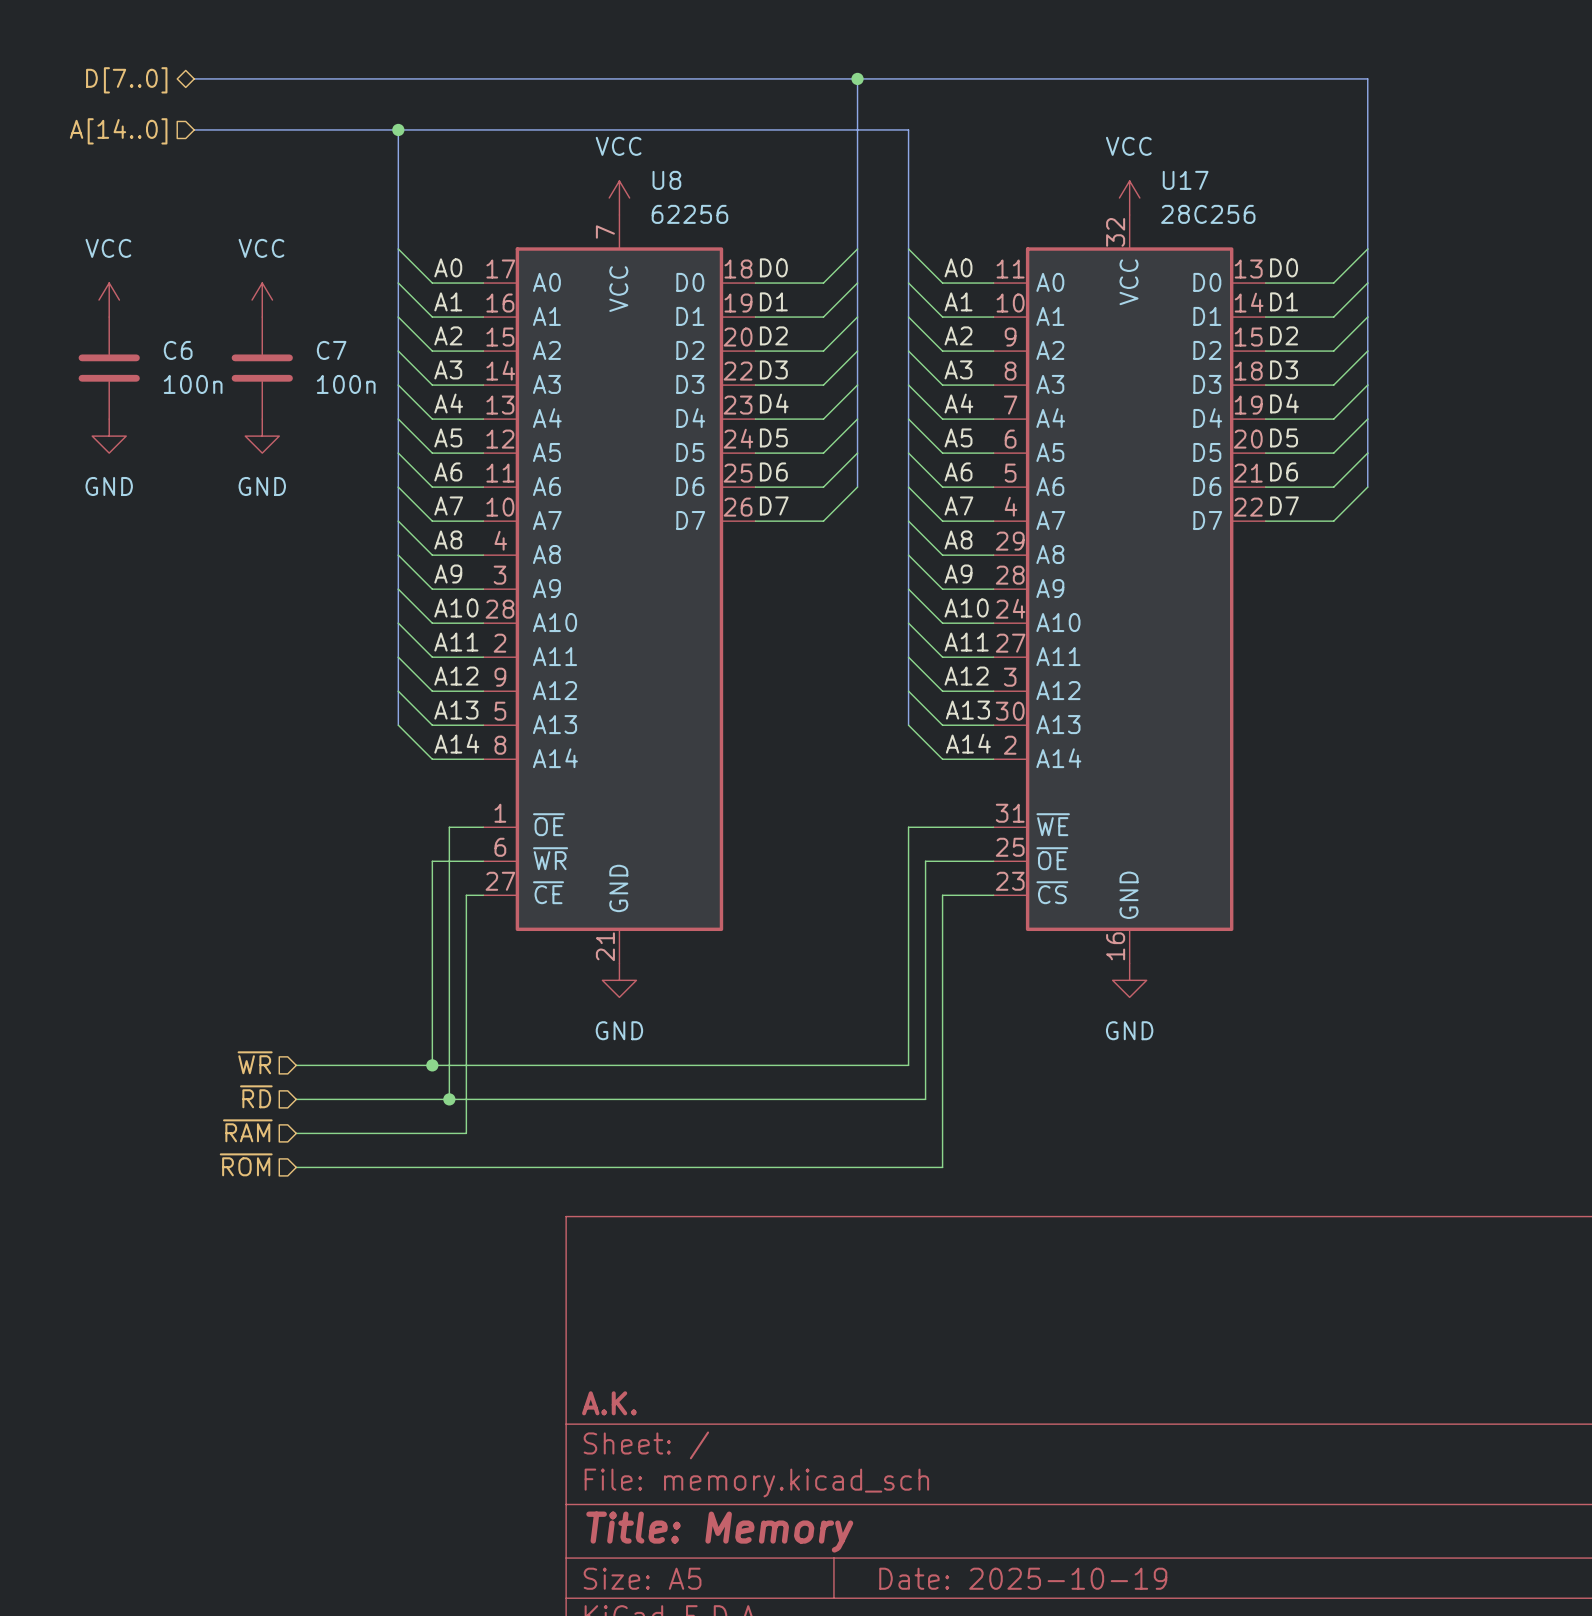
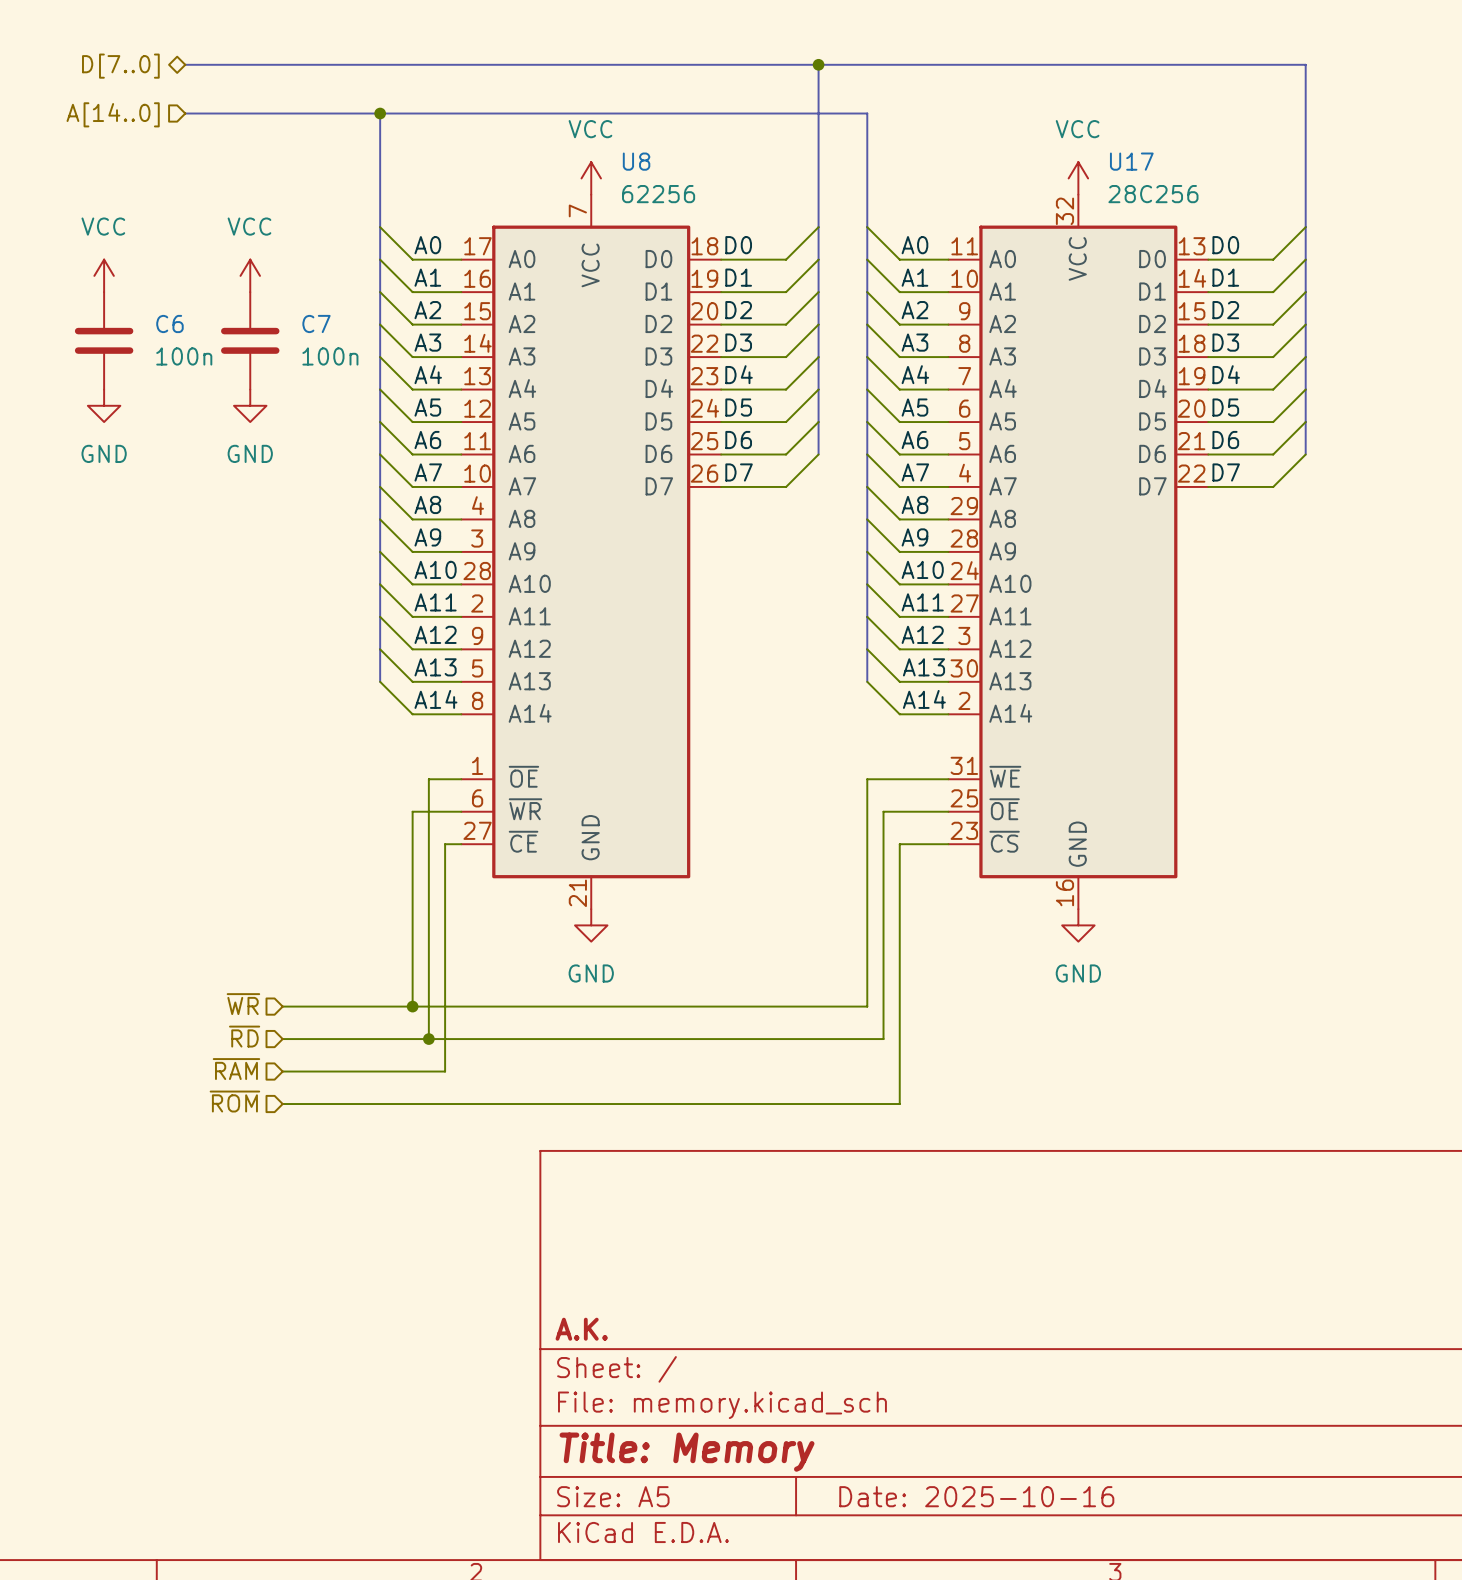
title block: Date: 2025-10-19 (1023, 1578) -> Date: 2025-10-16 (976, 1496)

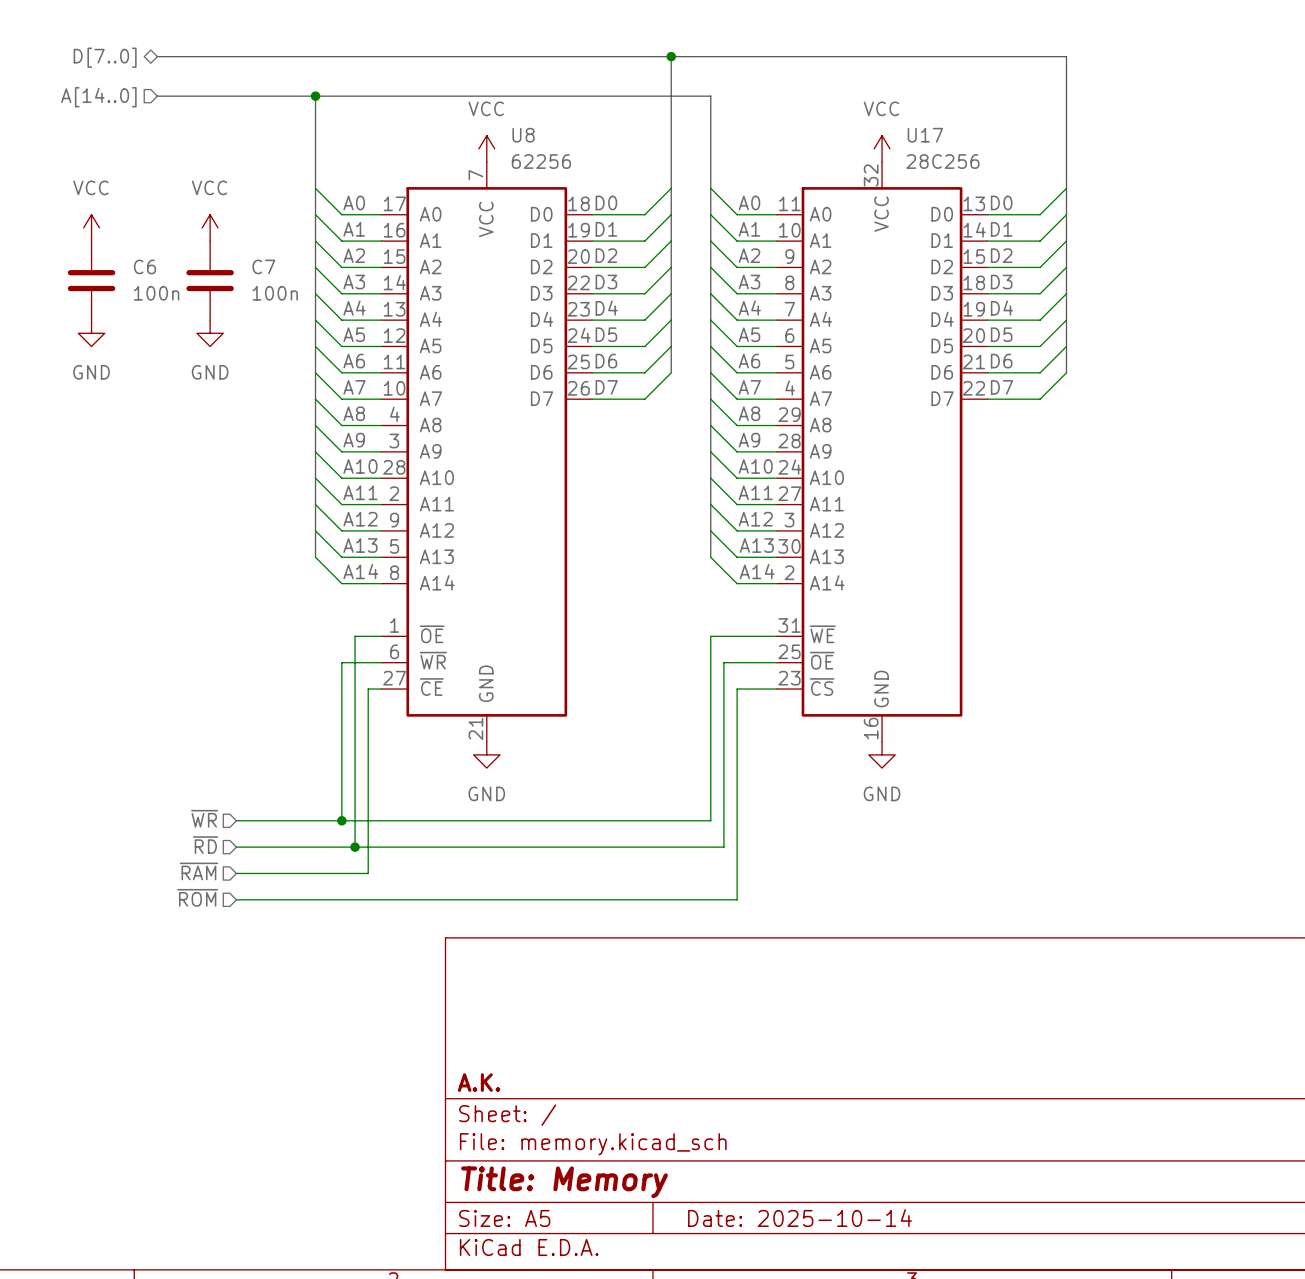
title block: Date: 2025-10-16 (976, 1496) -> Date: 2025-10-14 (799, 1218)

